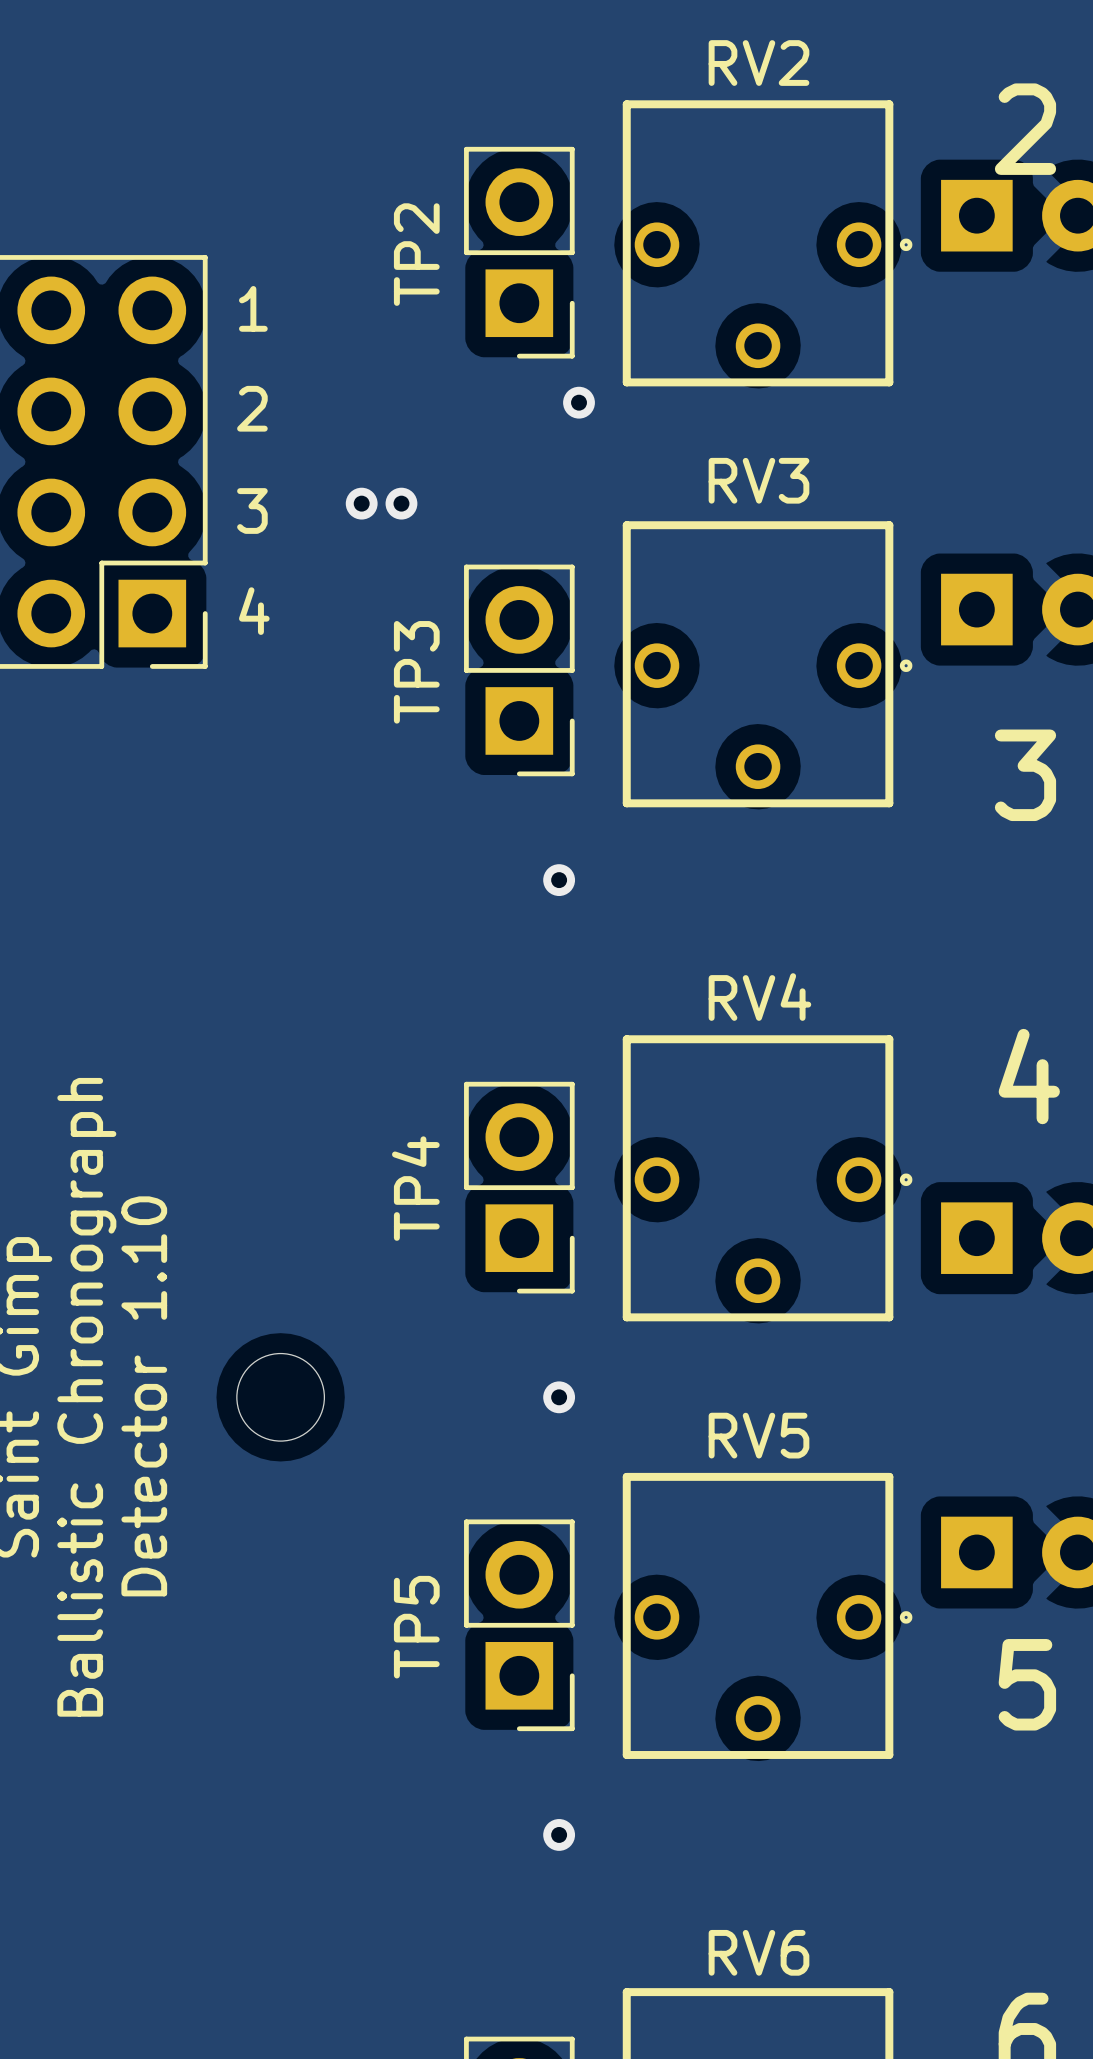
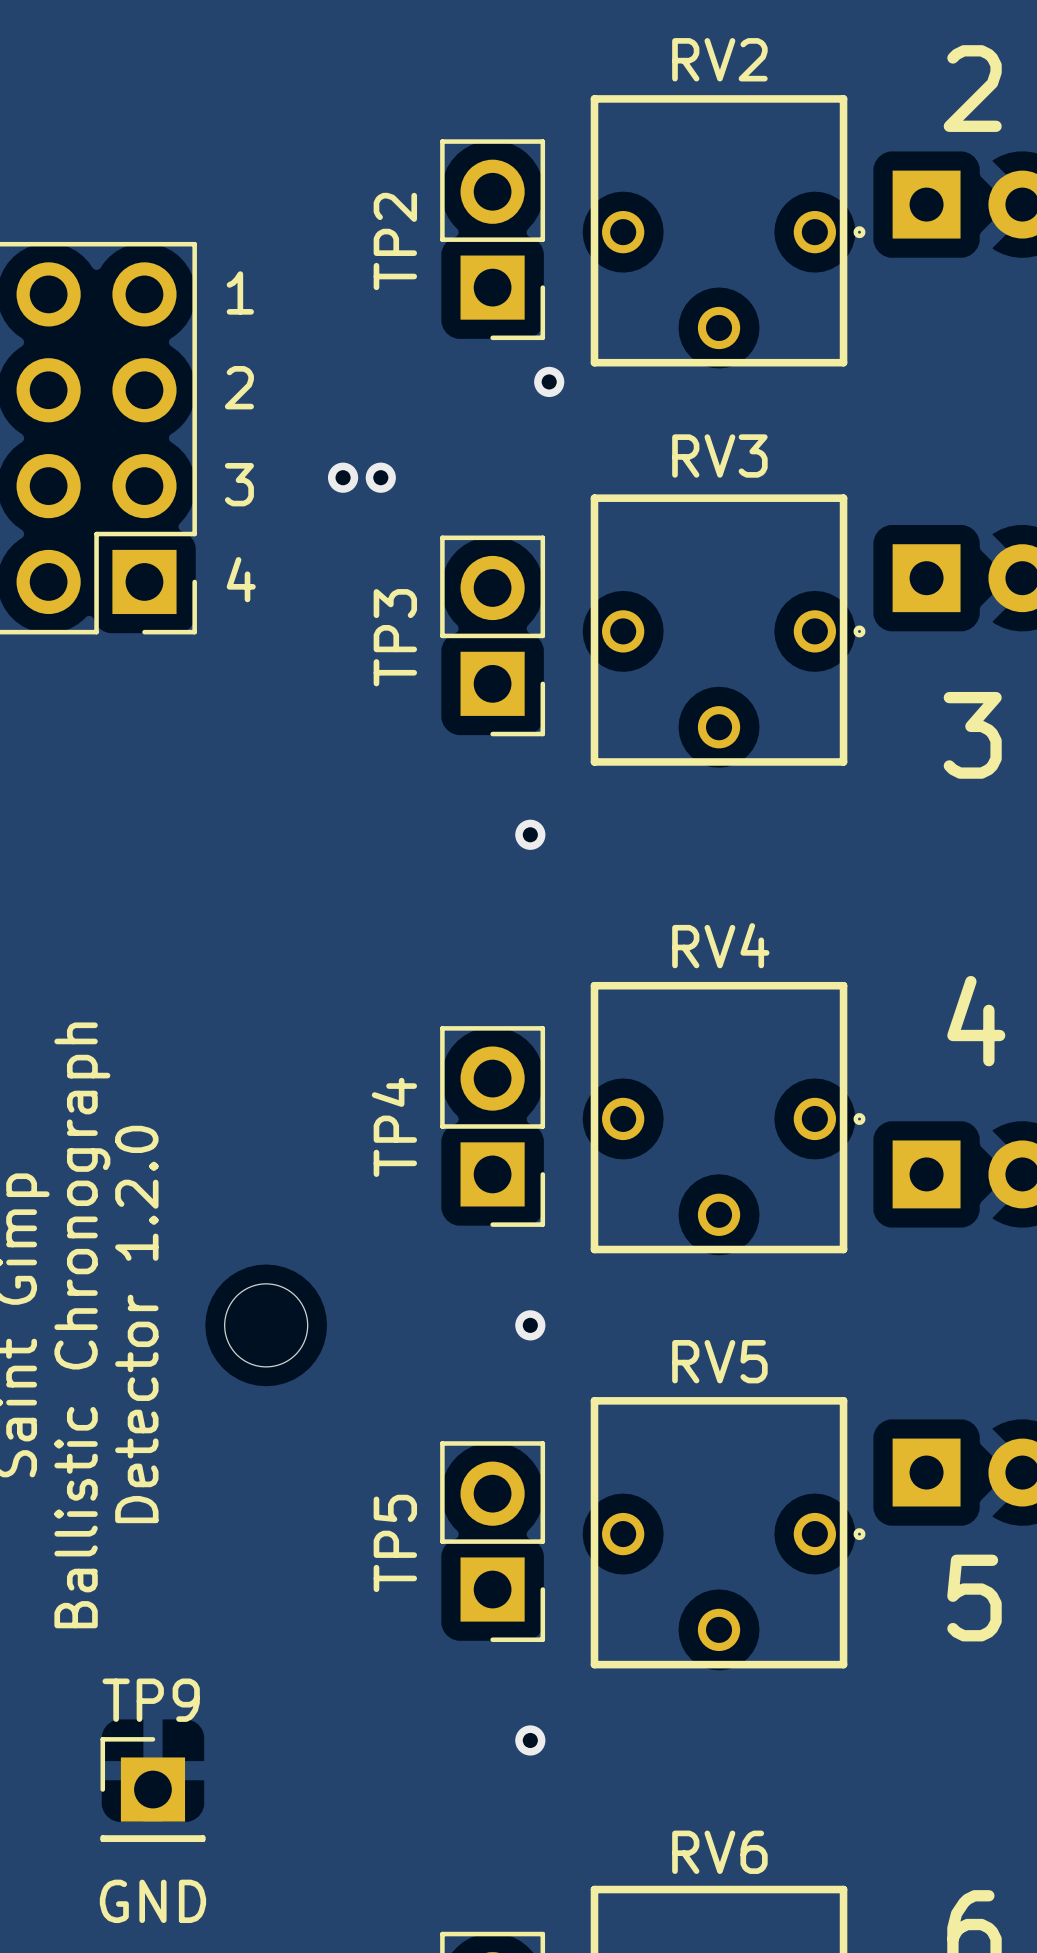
text position: 2 (1025, 129) -> 2 (972, 88)
text: Detector 1.10 (144, 1396) -> Detector 1.2.0 (136, 1324)
TP9: none -> (152, 1789)
text: none -> GND (152, 1901)

